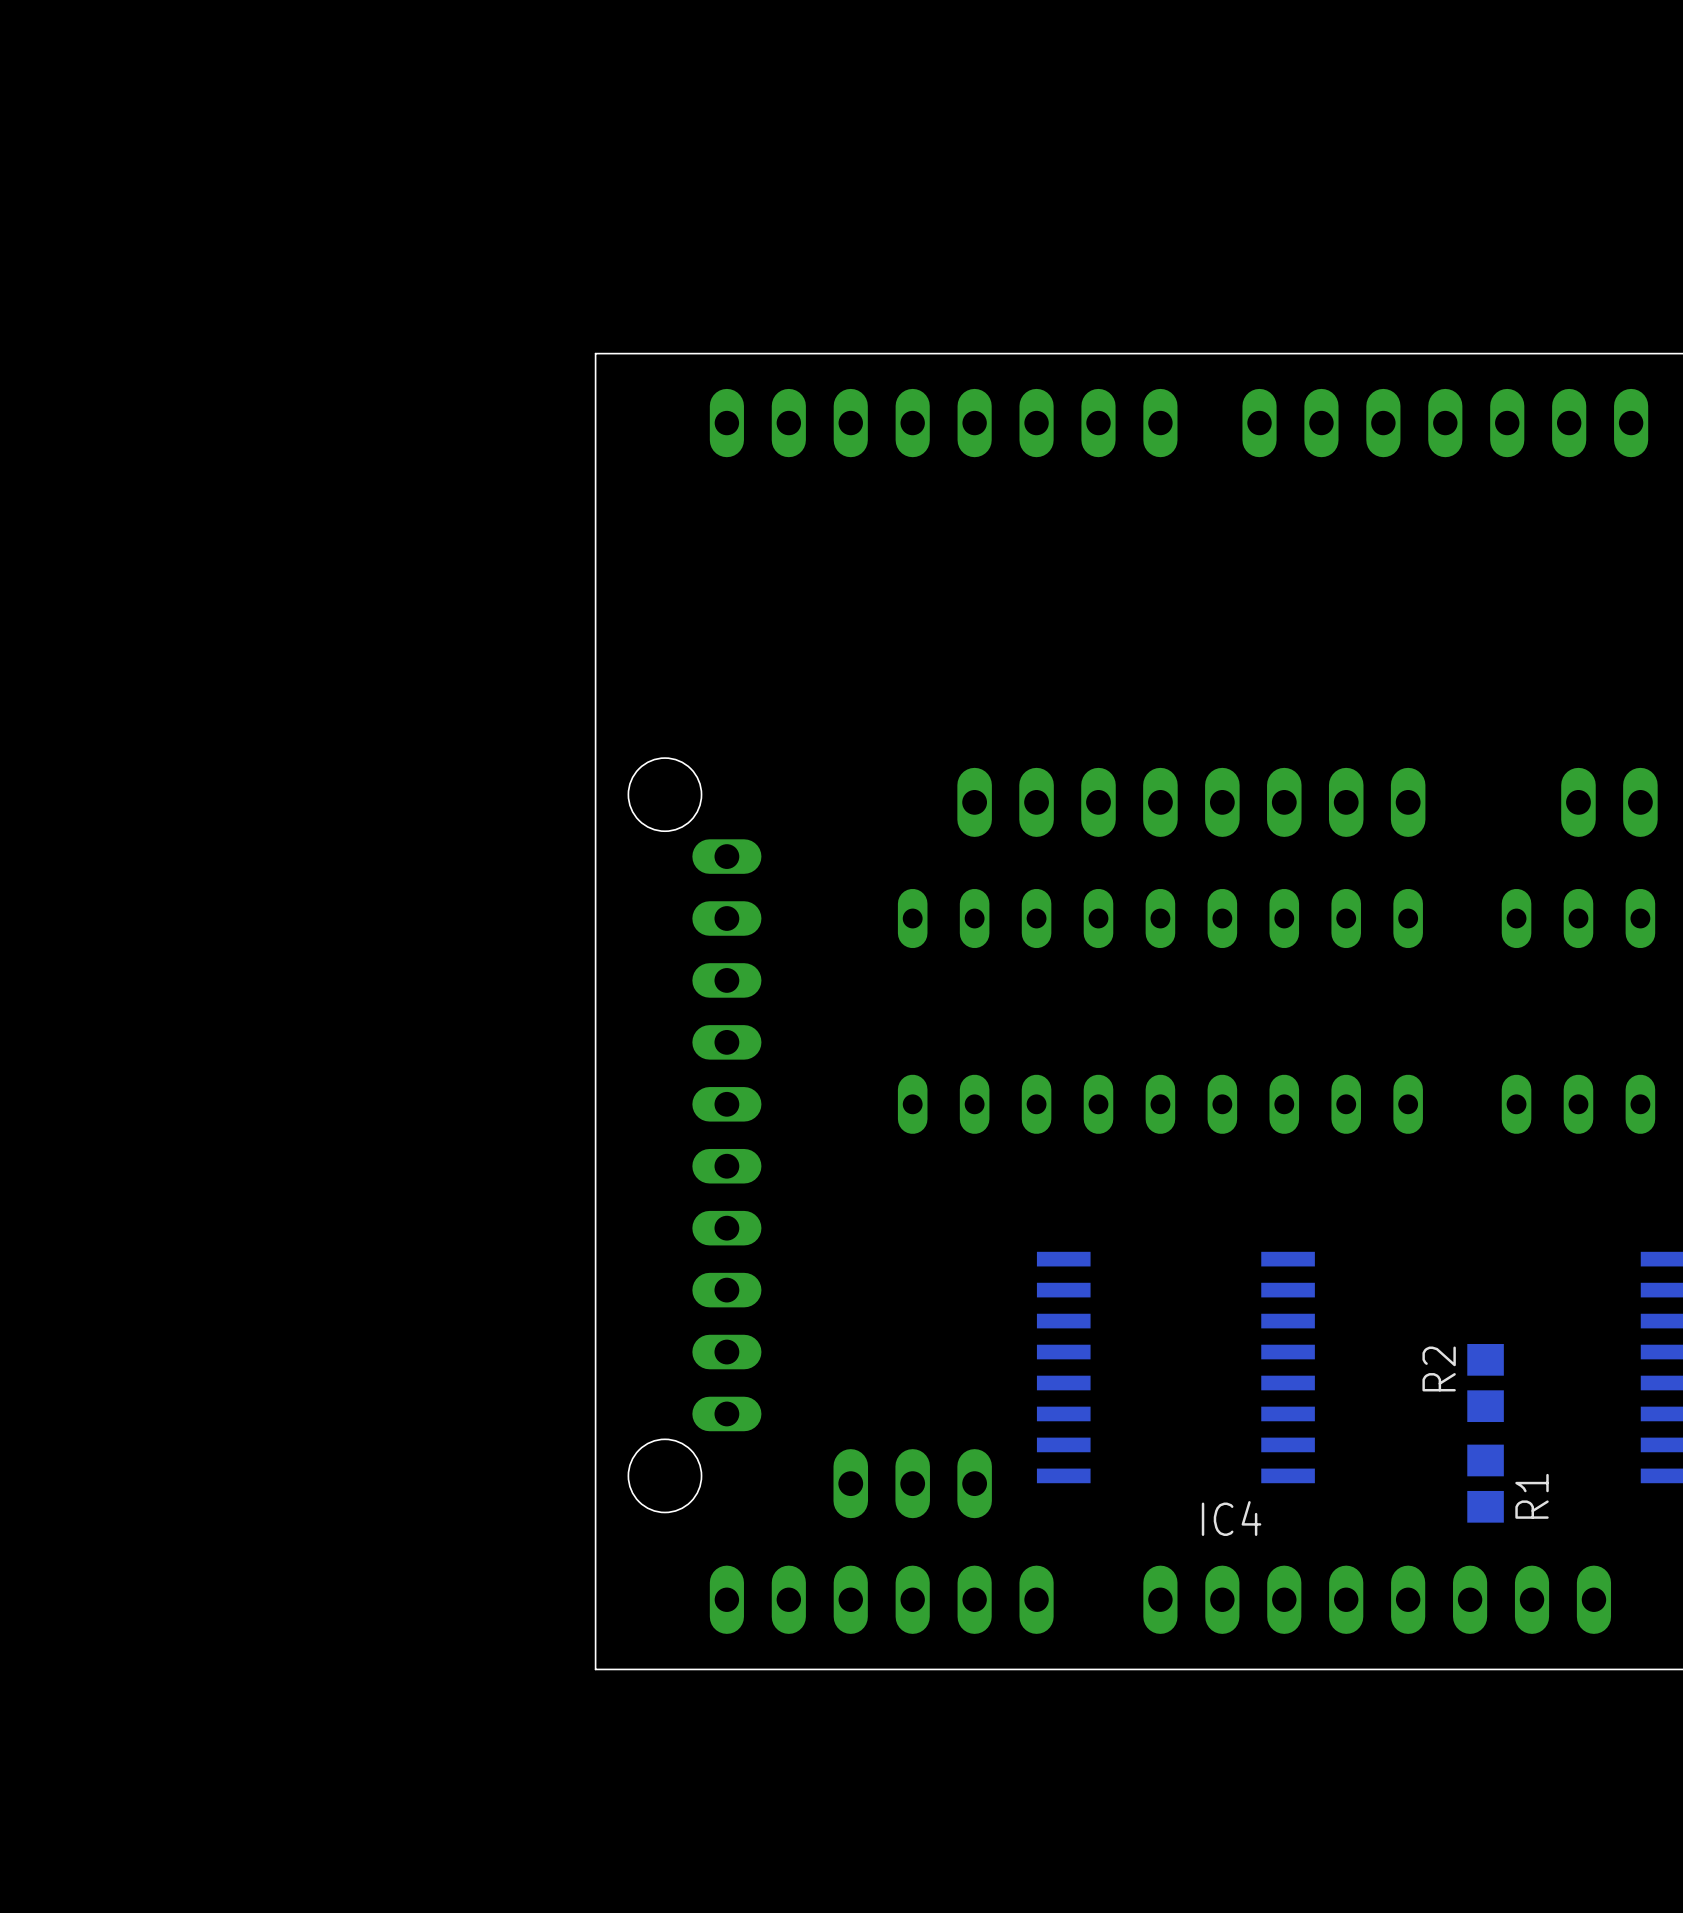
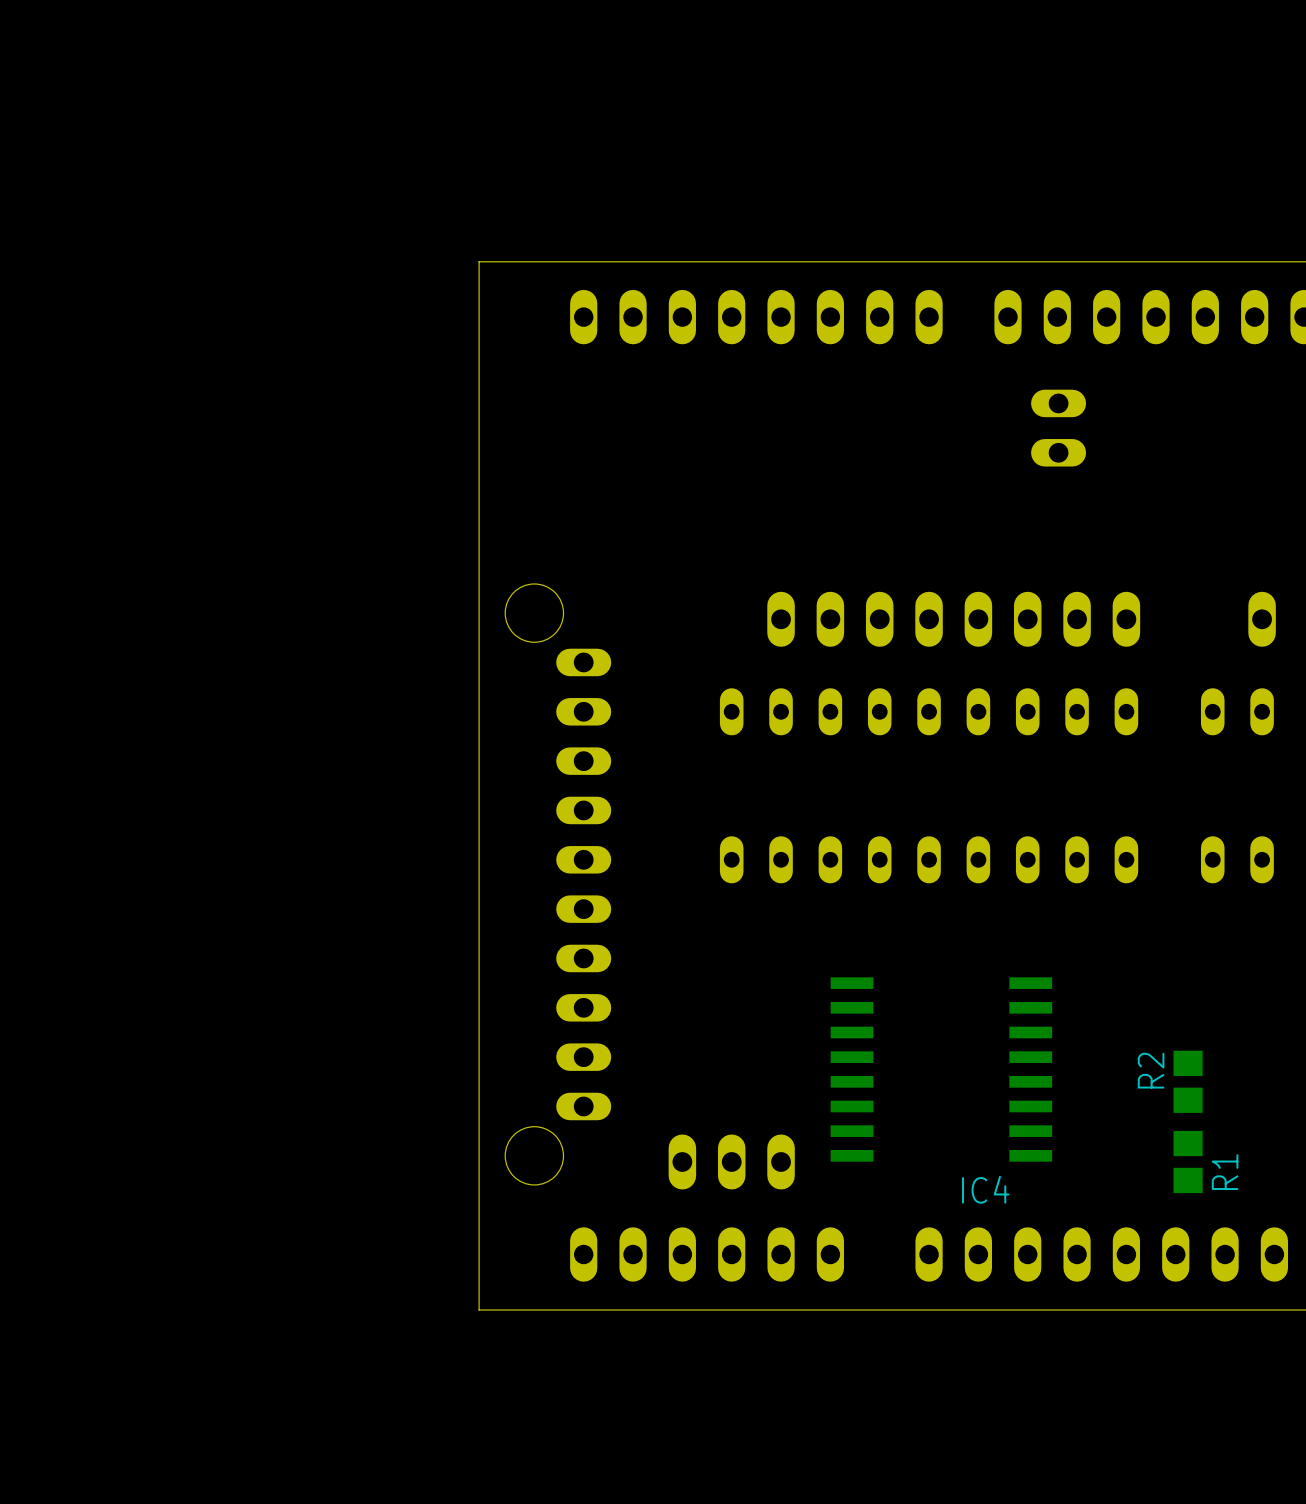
part: none -> (1058, 428)

